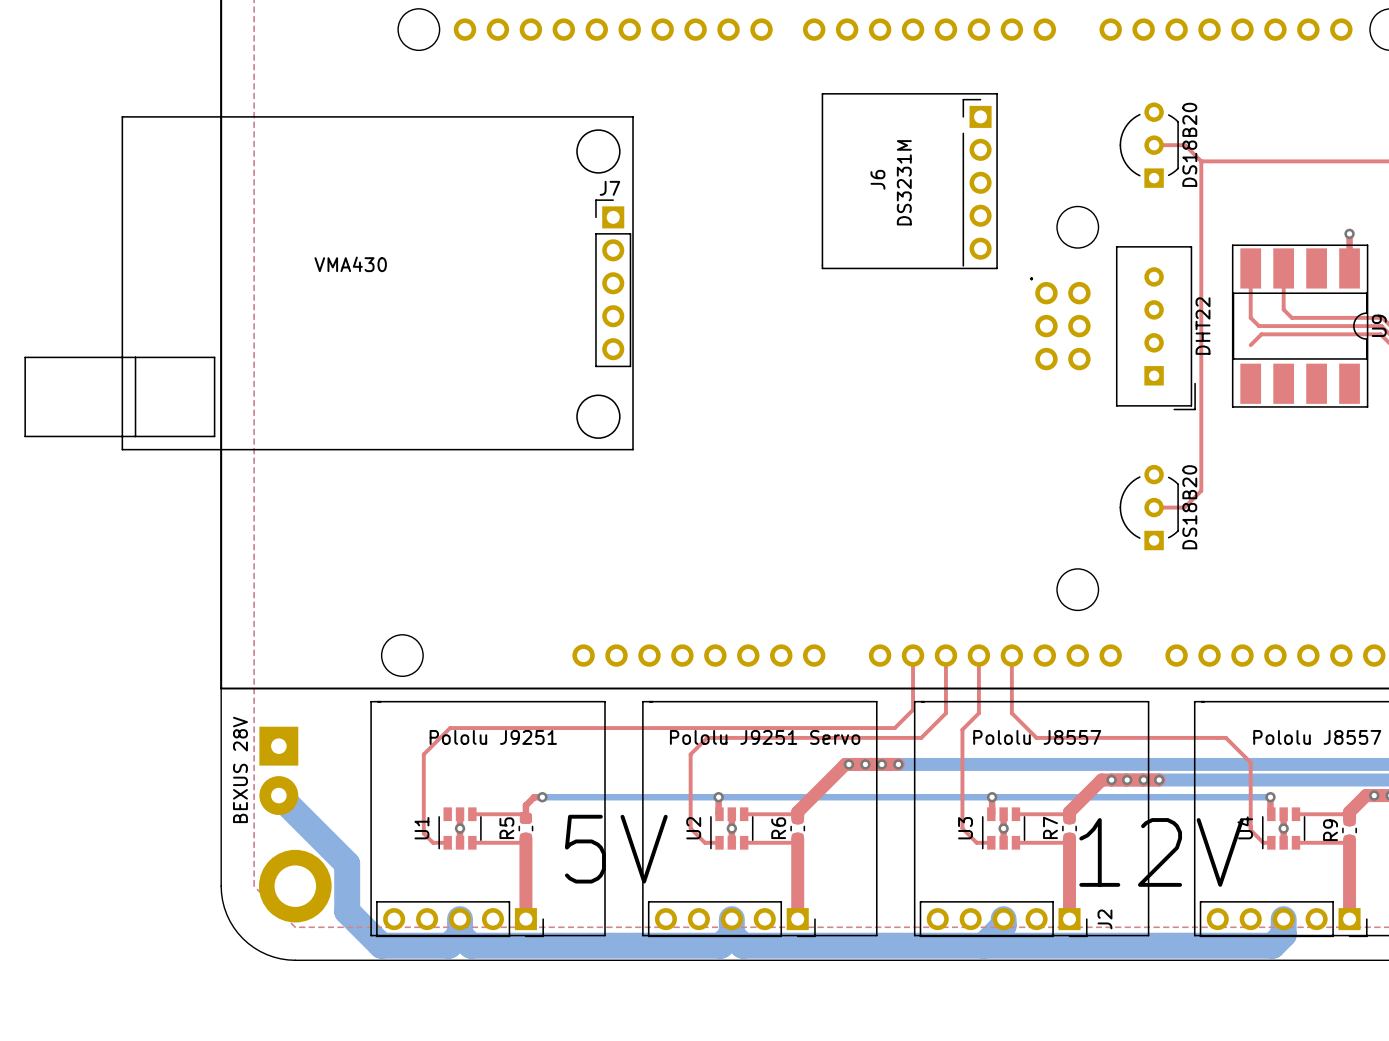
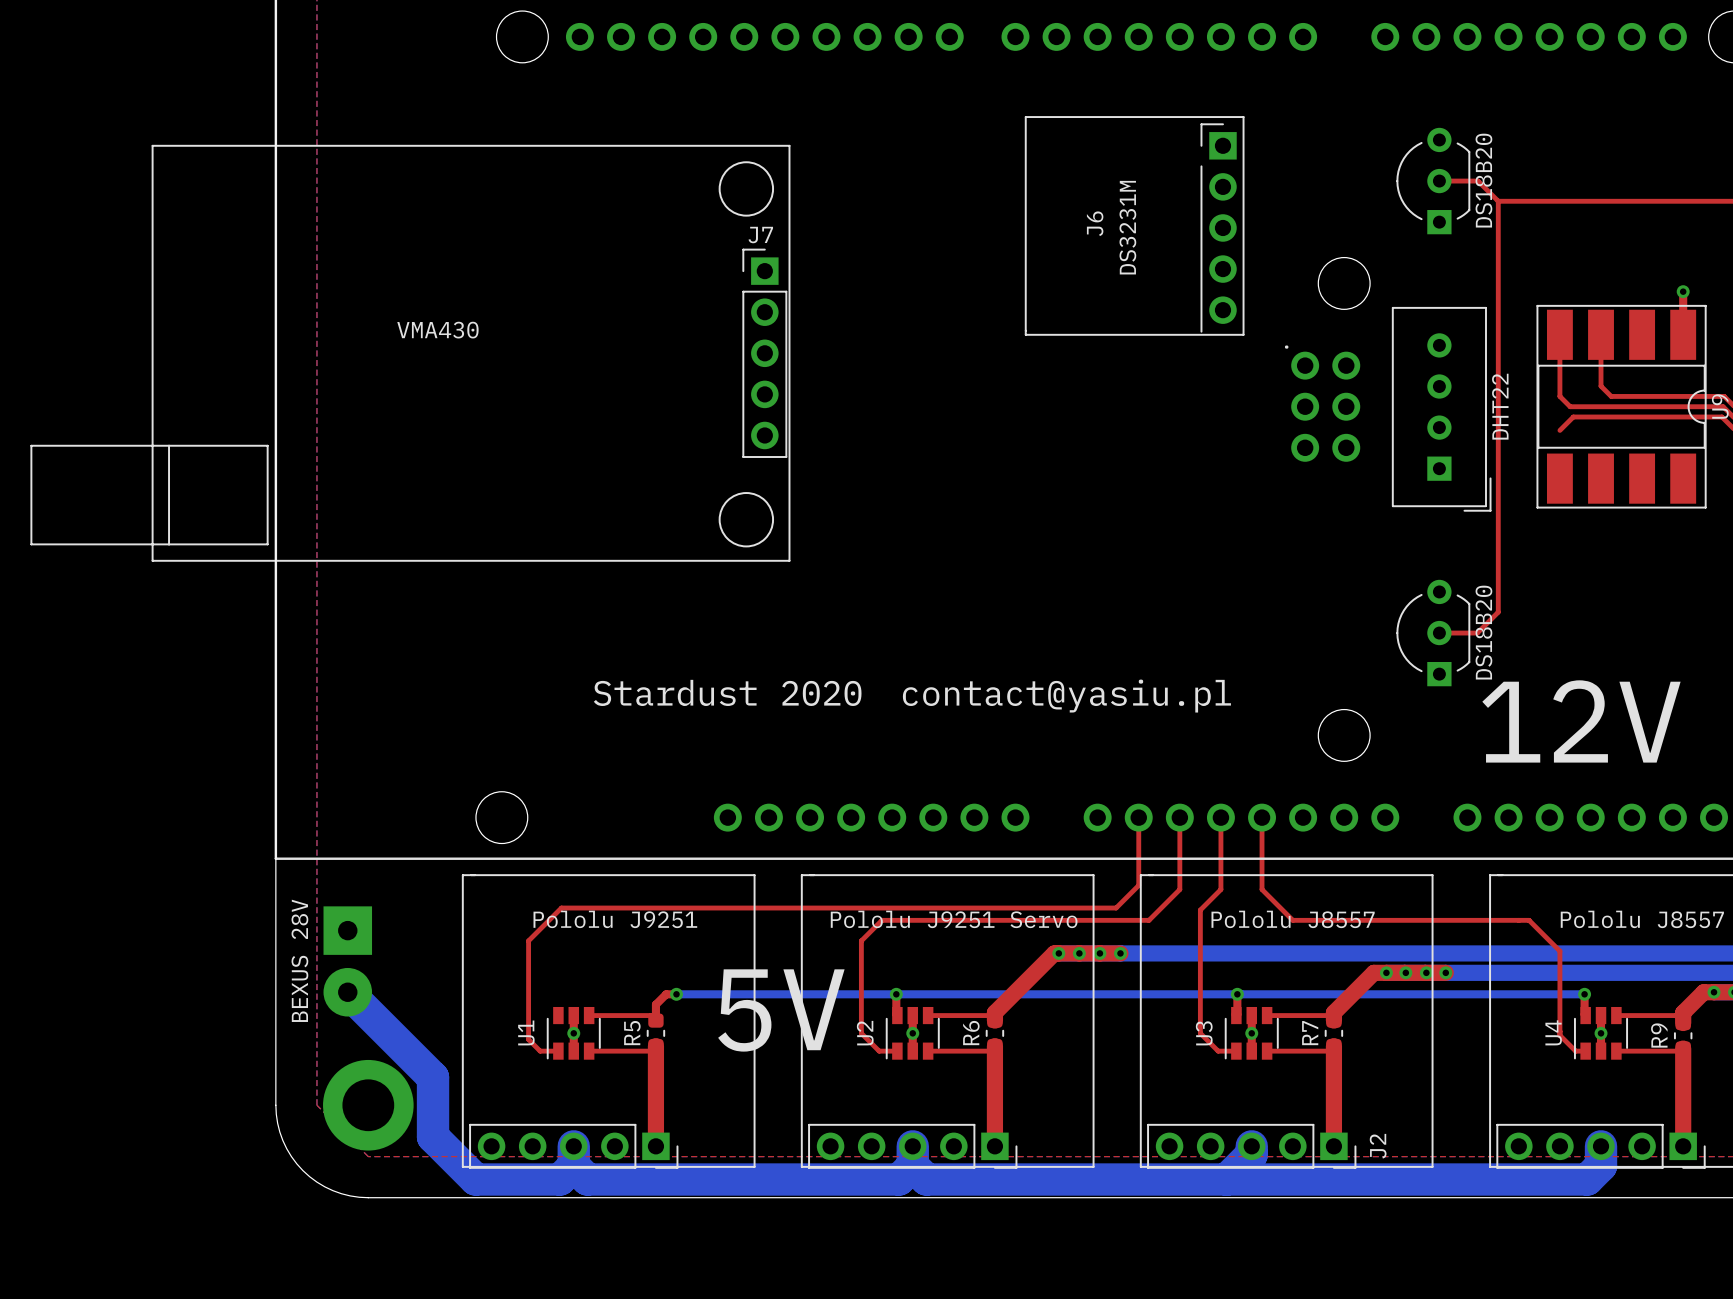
text: none -> Stardust 2020 (727, 692)
text: none -> contact@yasiu.pl (1066, 696)
text position: 5V (616, 849) -> 5V (781, 1010)
text position: 12V (1161, 852) -> 12V (1581, 721)

